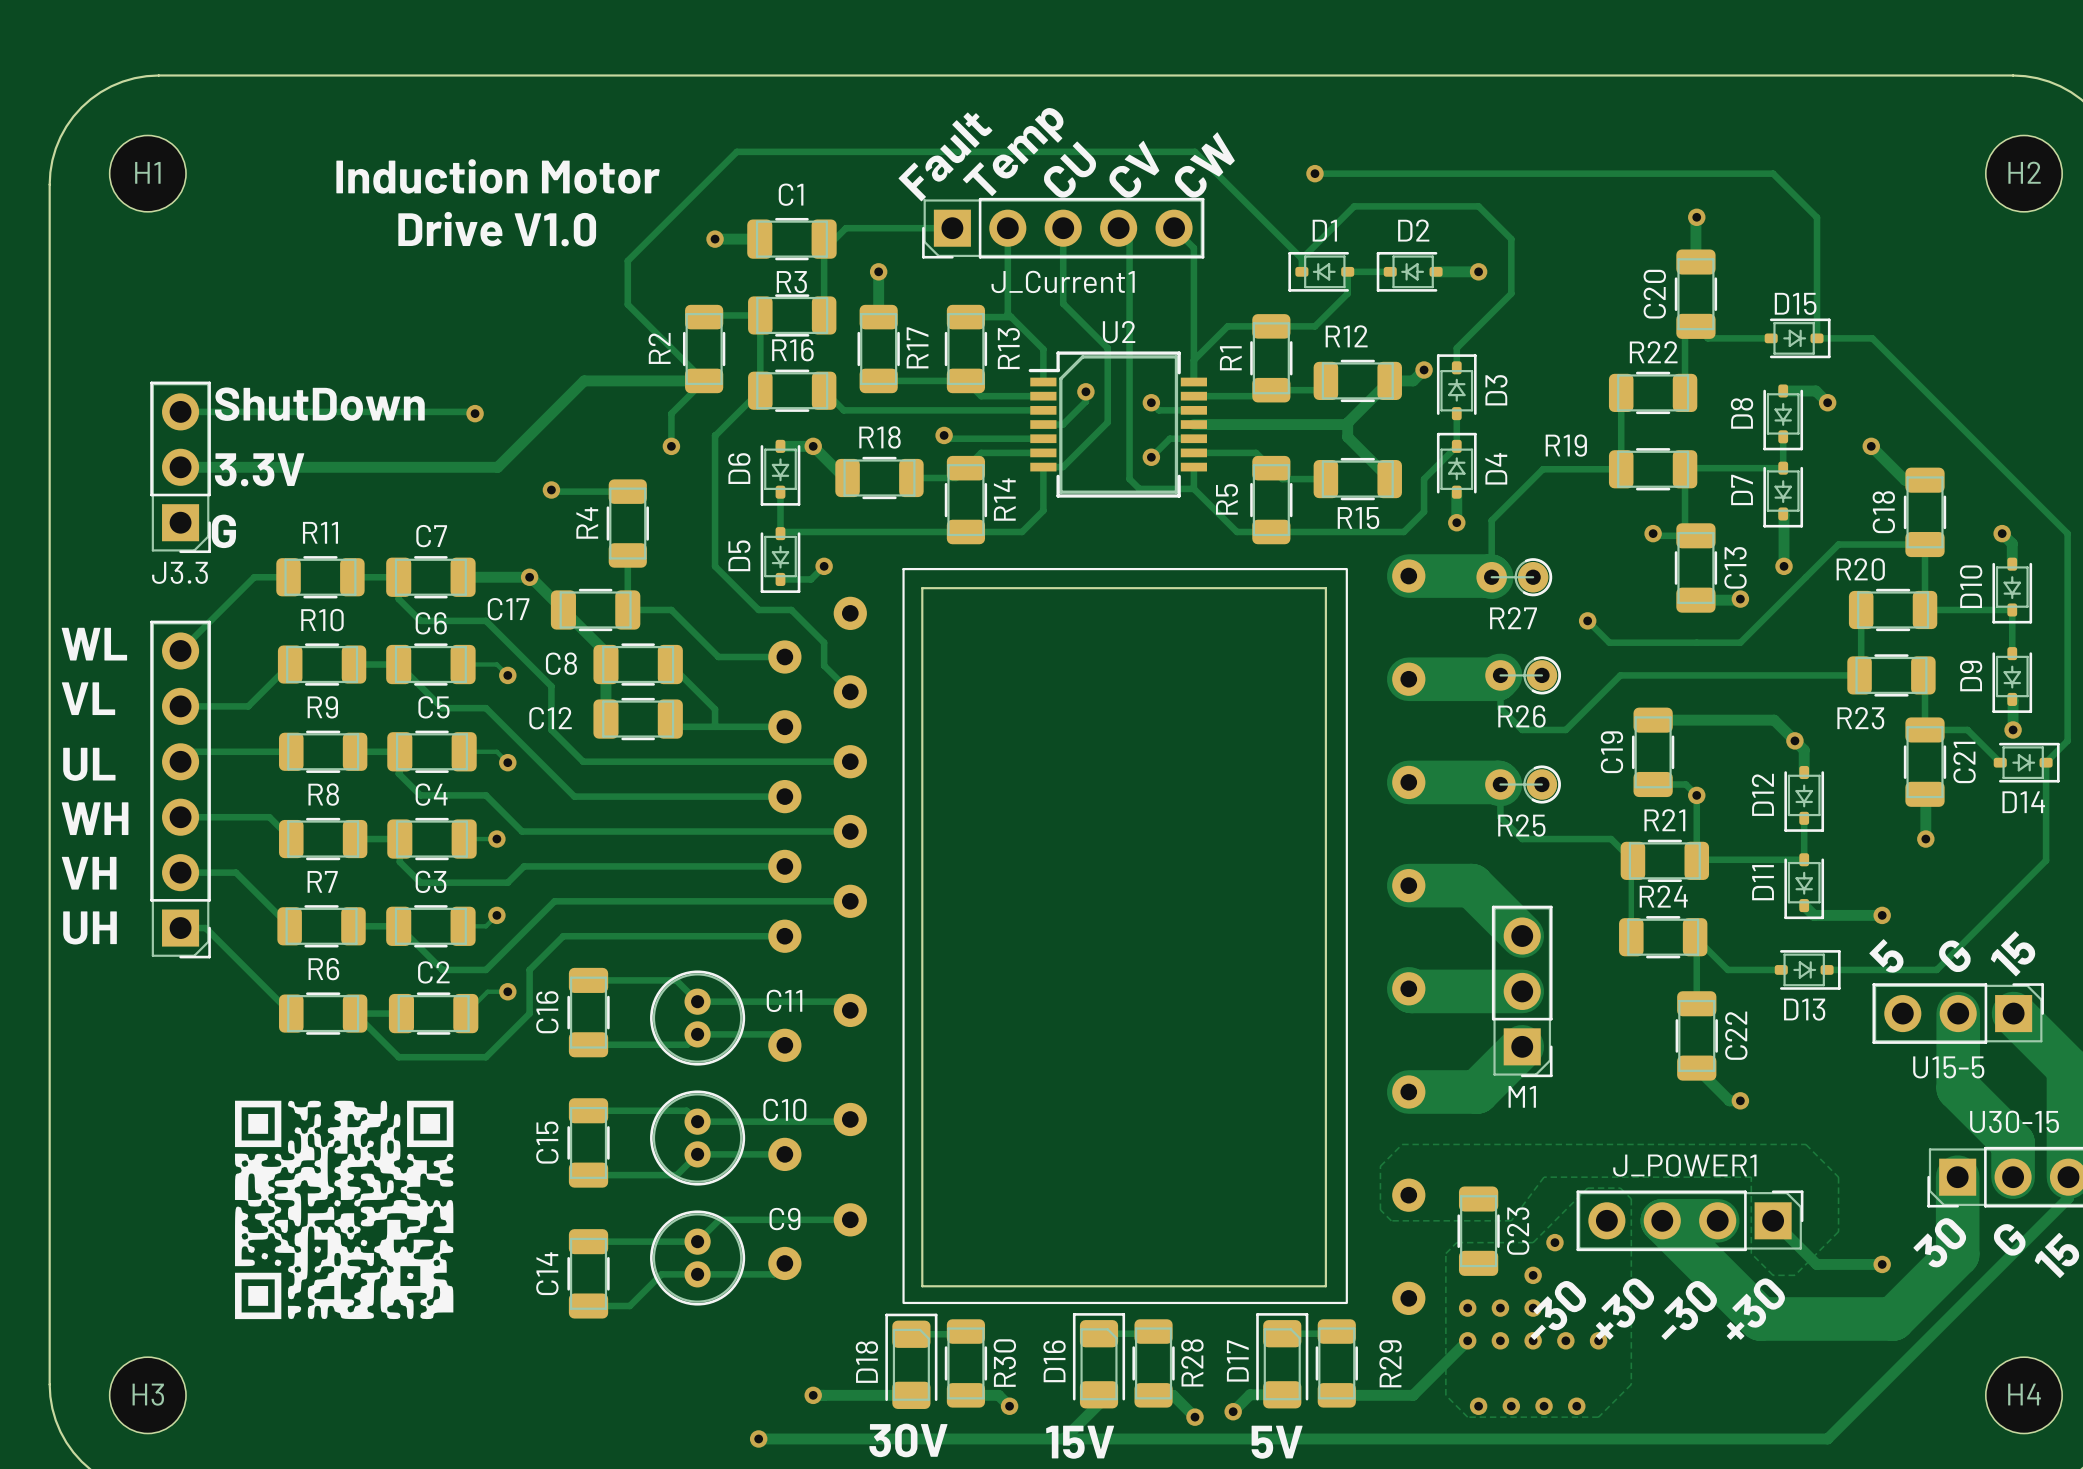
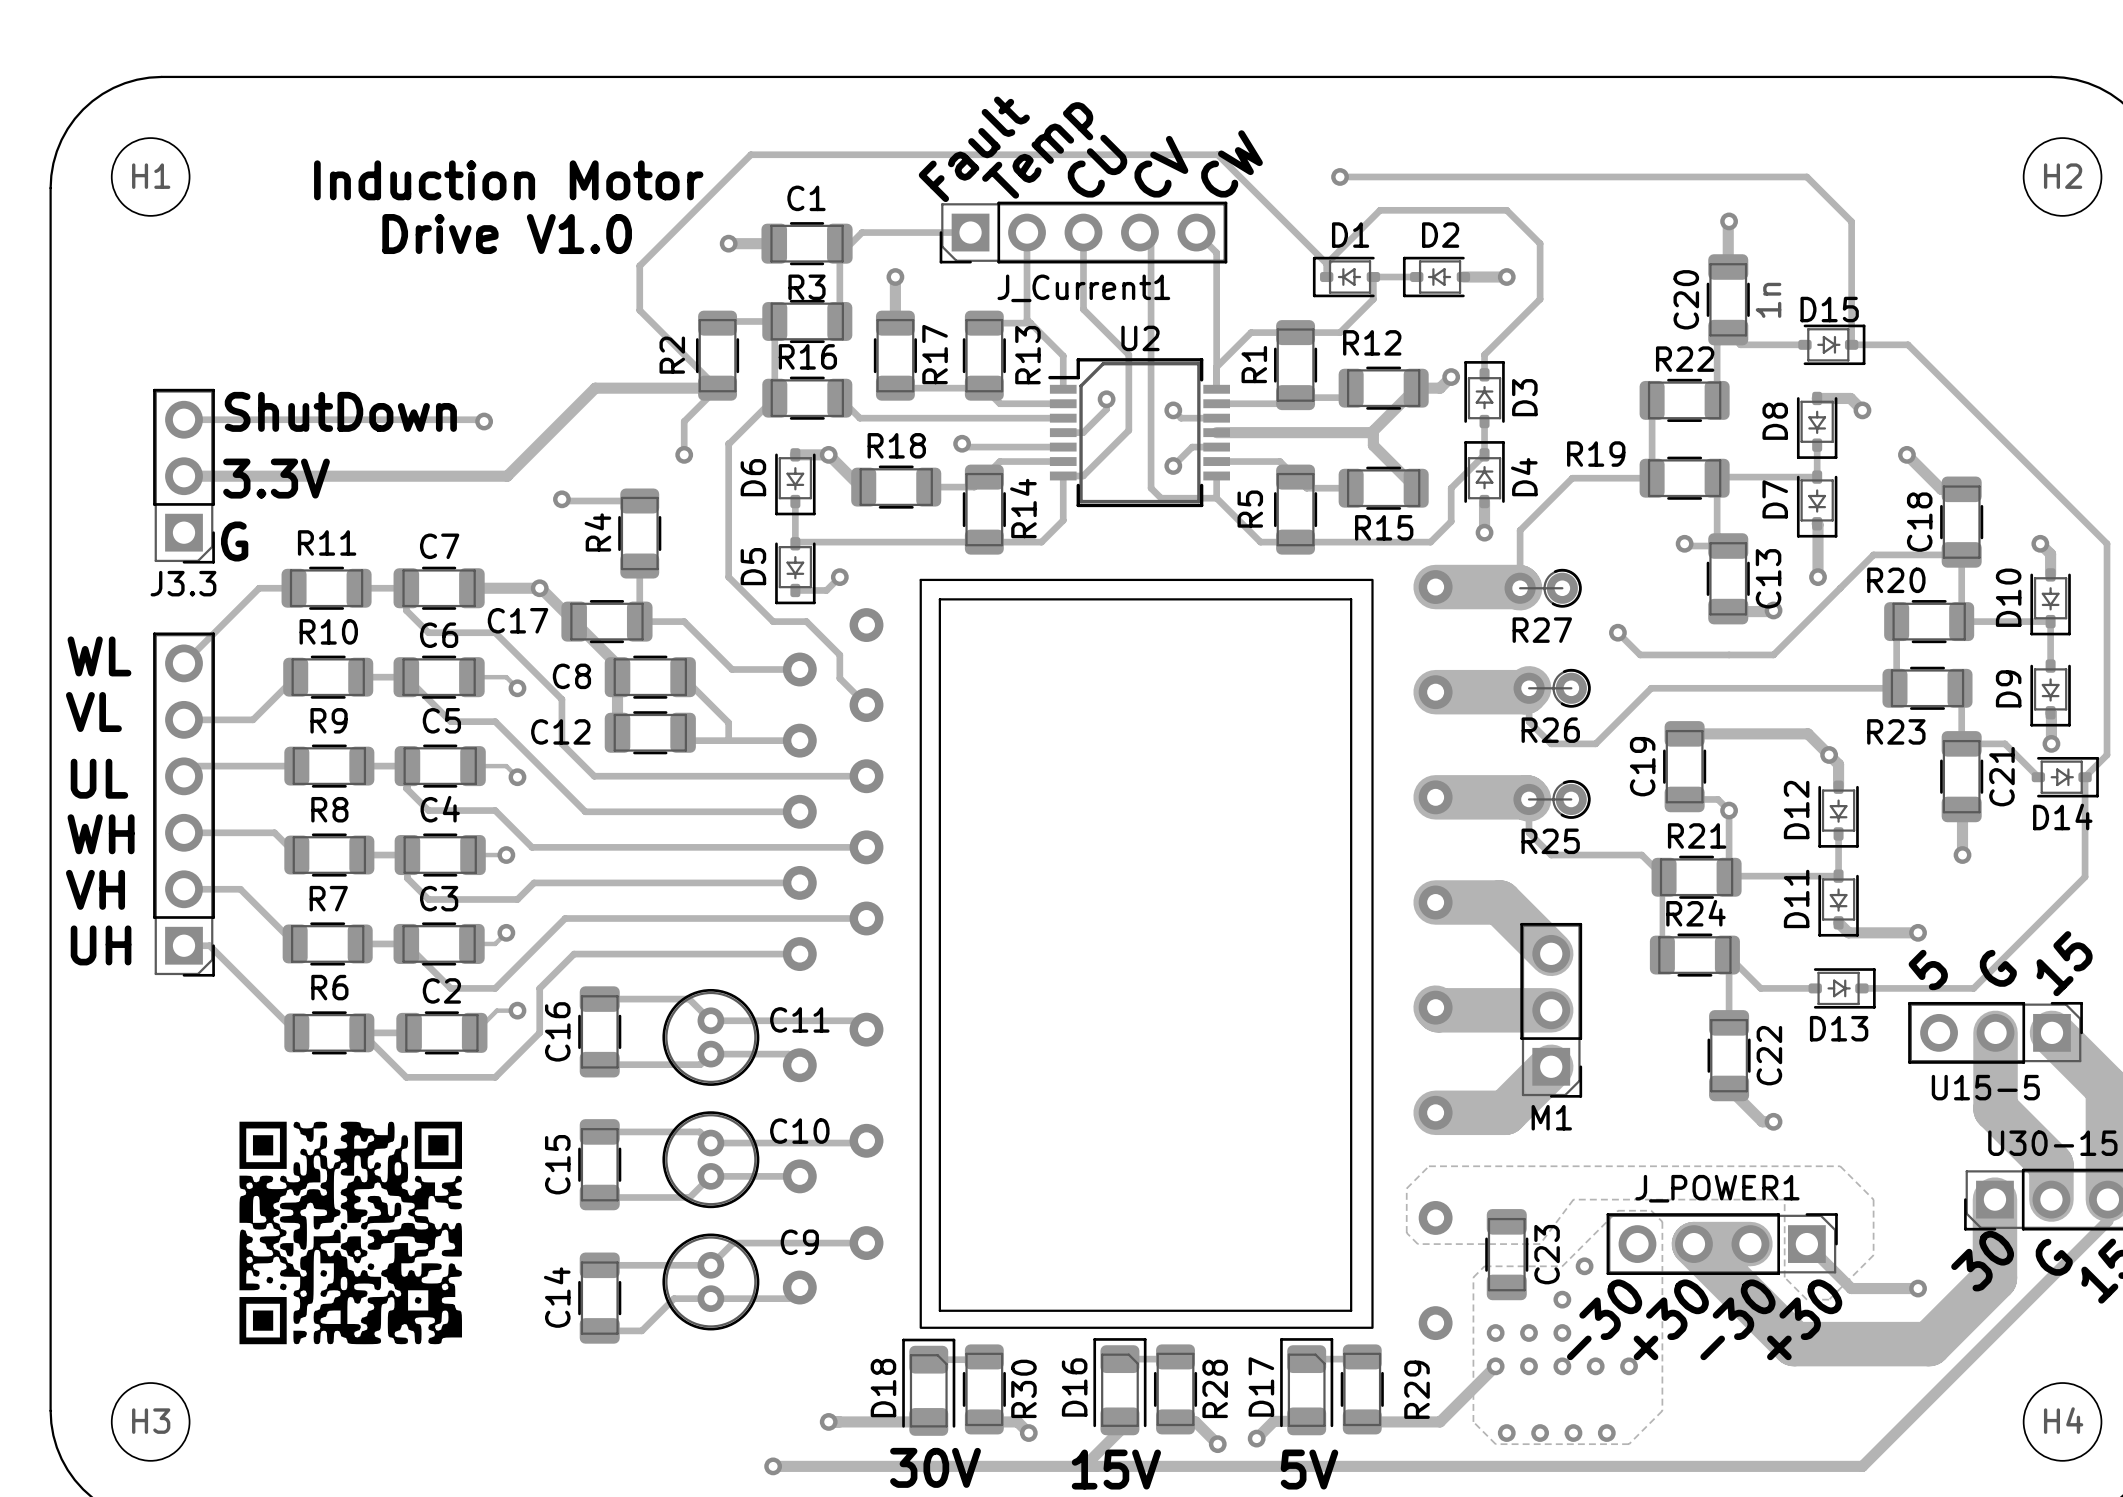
C20 value: none -> 1n (1768, 300)

